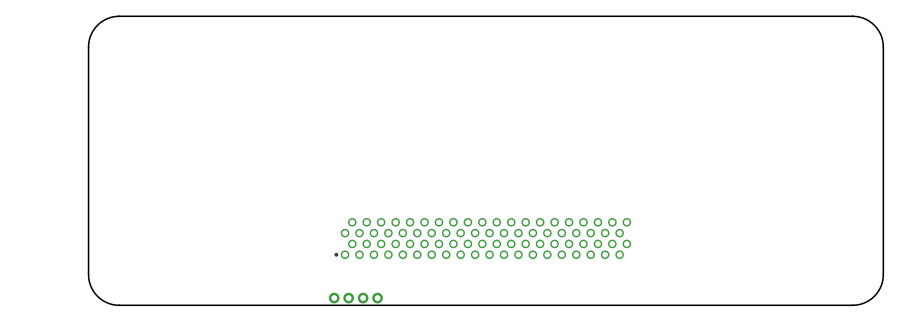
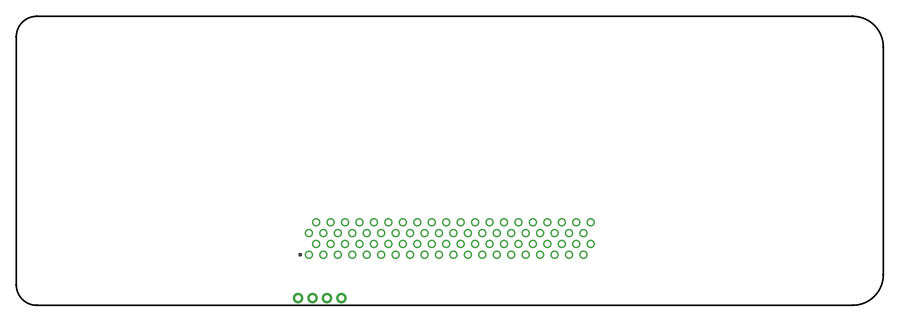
board edge: (119, 16) (105, 19) (97, 25) (91, 33) (88, 46) (88, 278) (91, 287) (100, 298) (109, 303) (119, 305) -> (119, 16) (34, 16) (22, 22) (17, 28) (16, 36) (16, 284) (17, 292) (24, 301) (34, 305) (119, 305)
part position: (482, 238) -> (446, 238)
part position: (355, 298) -> (319, 298)

